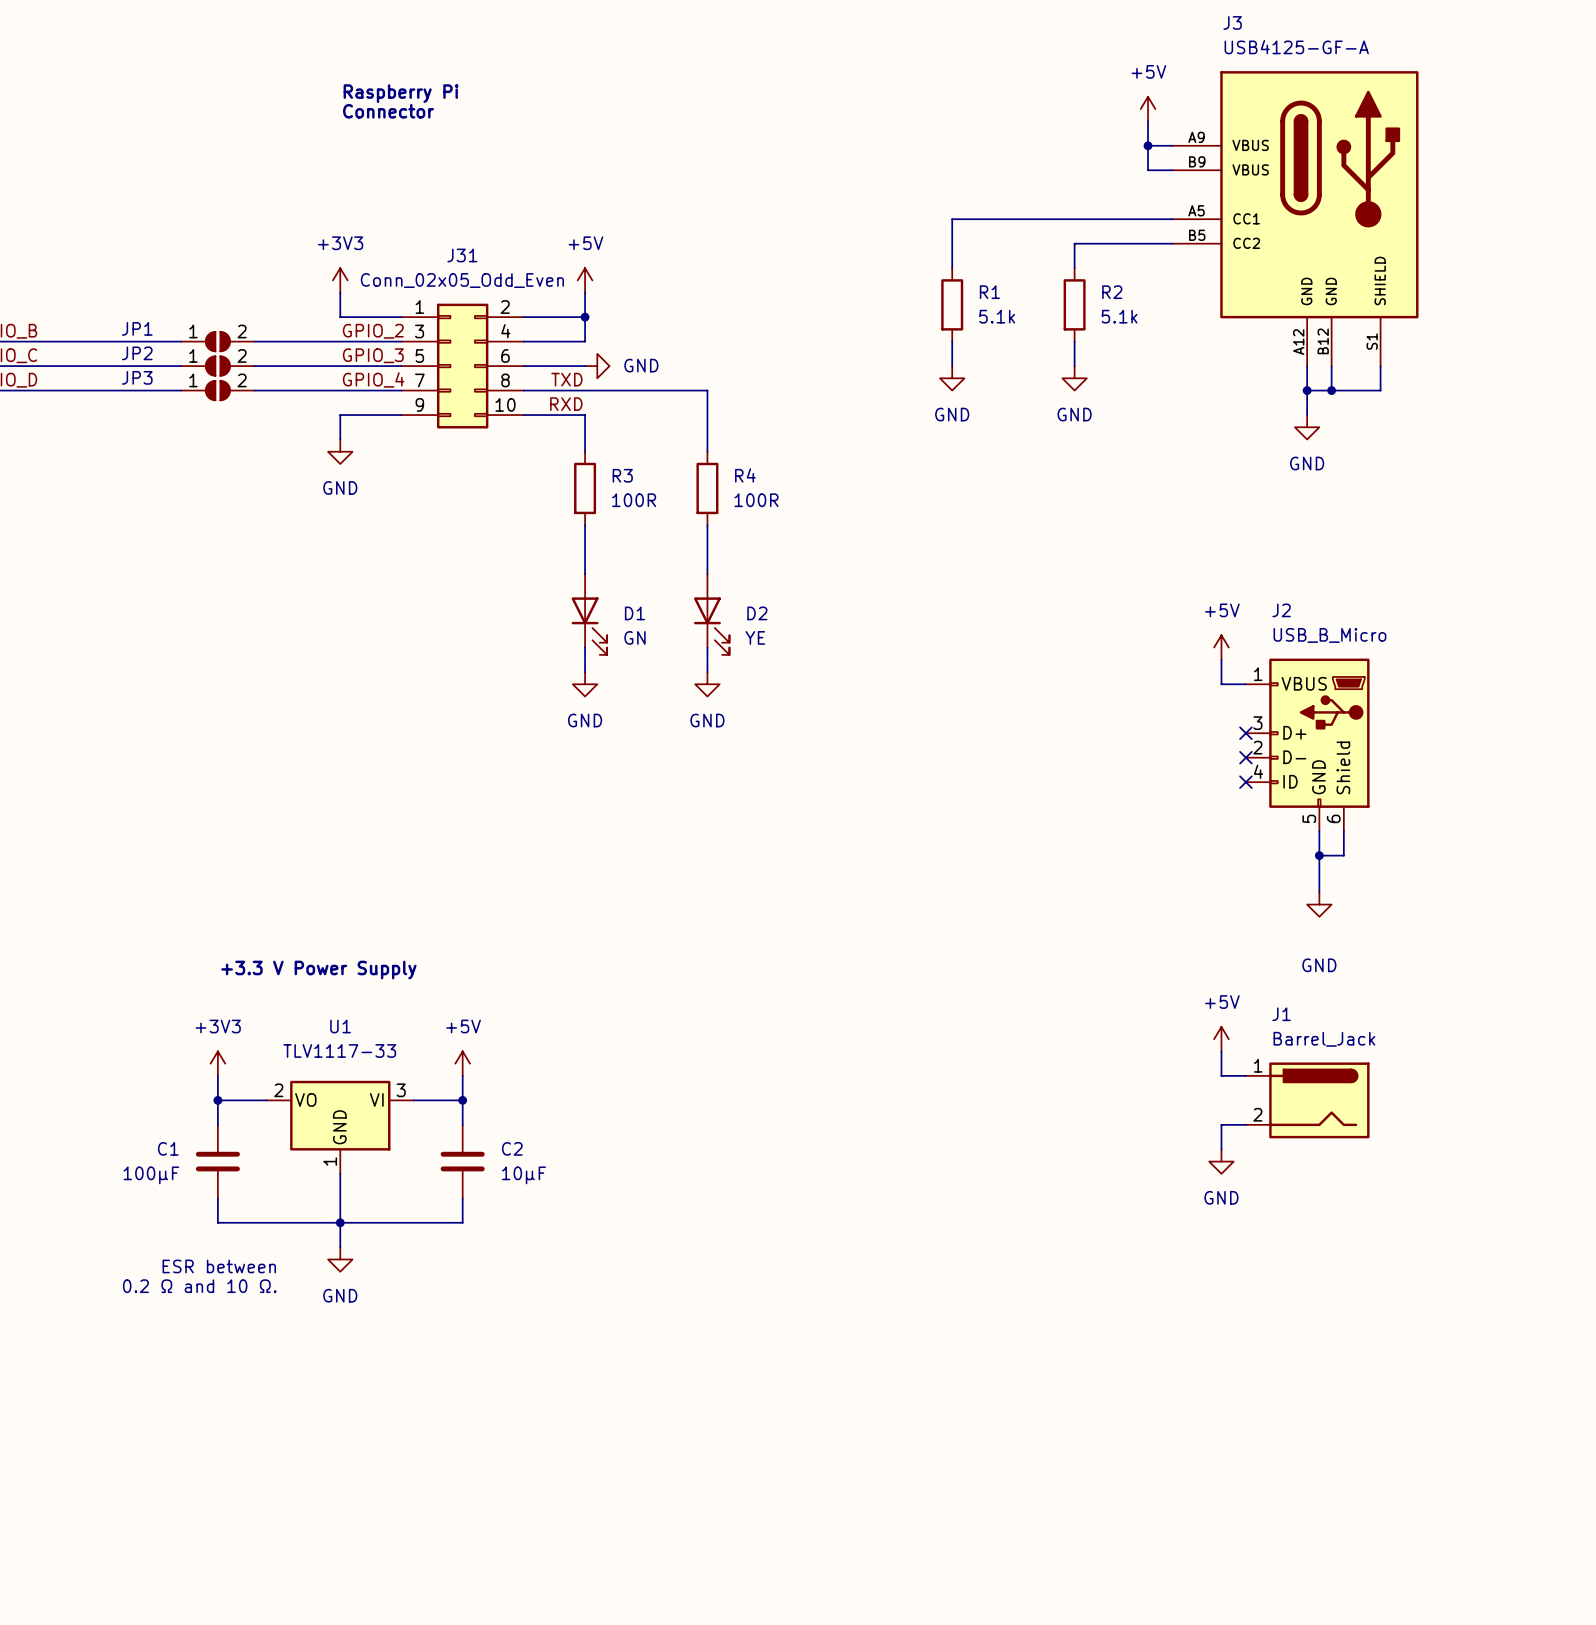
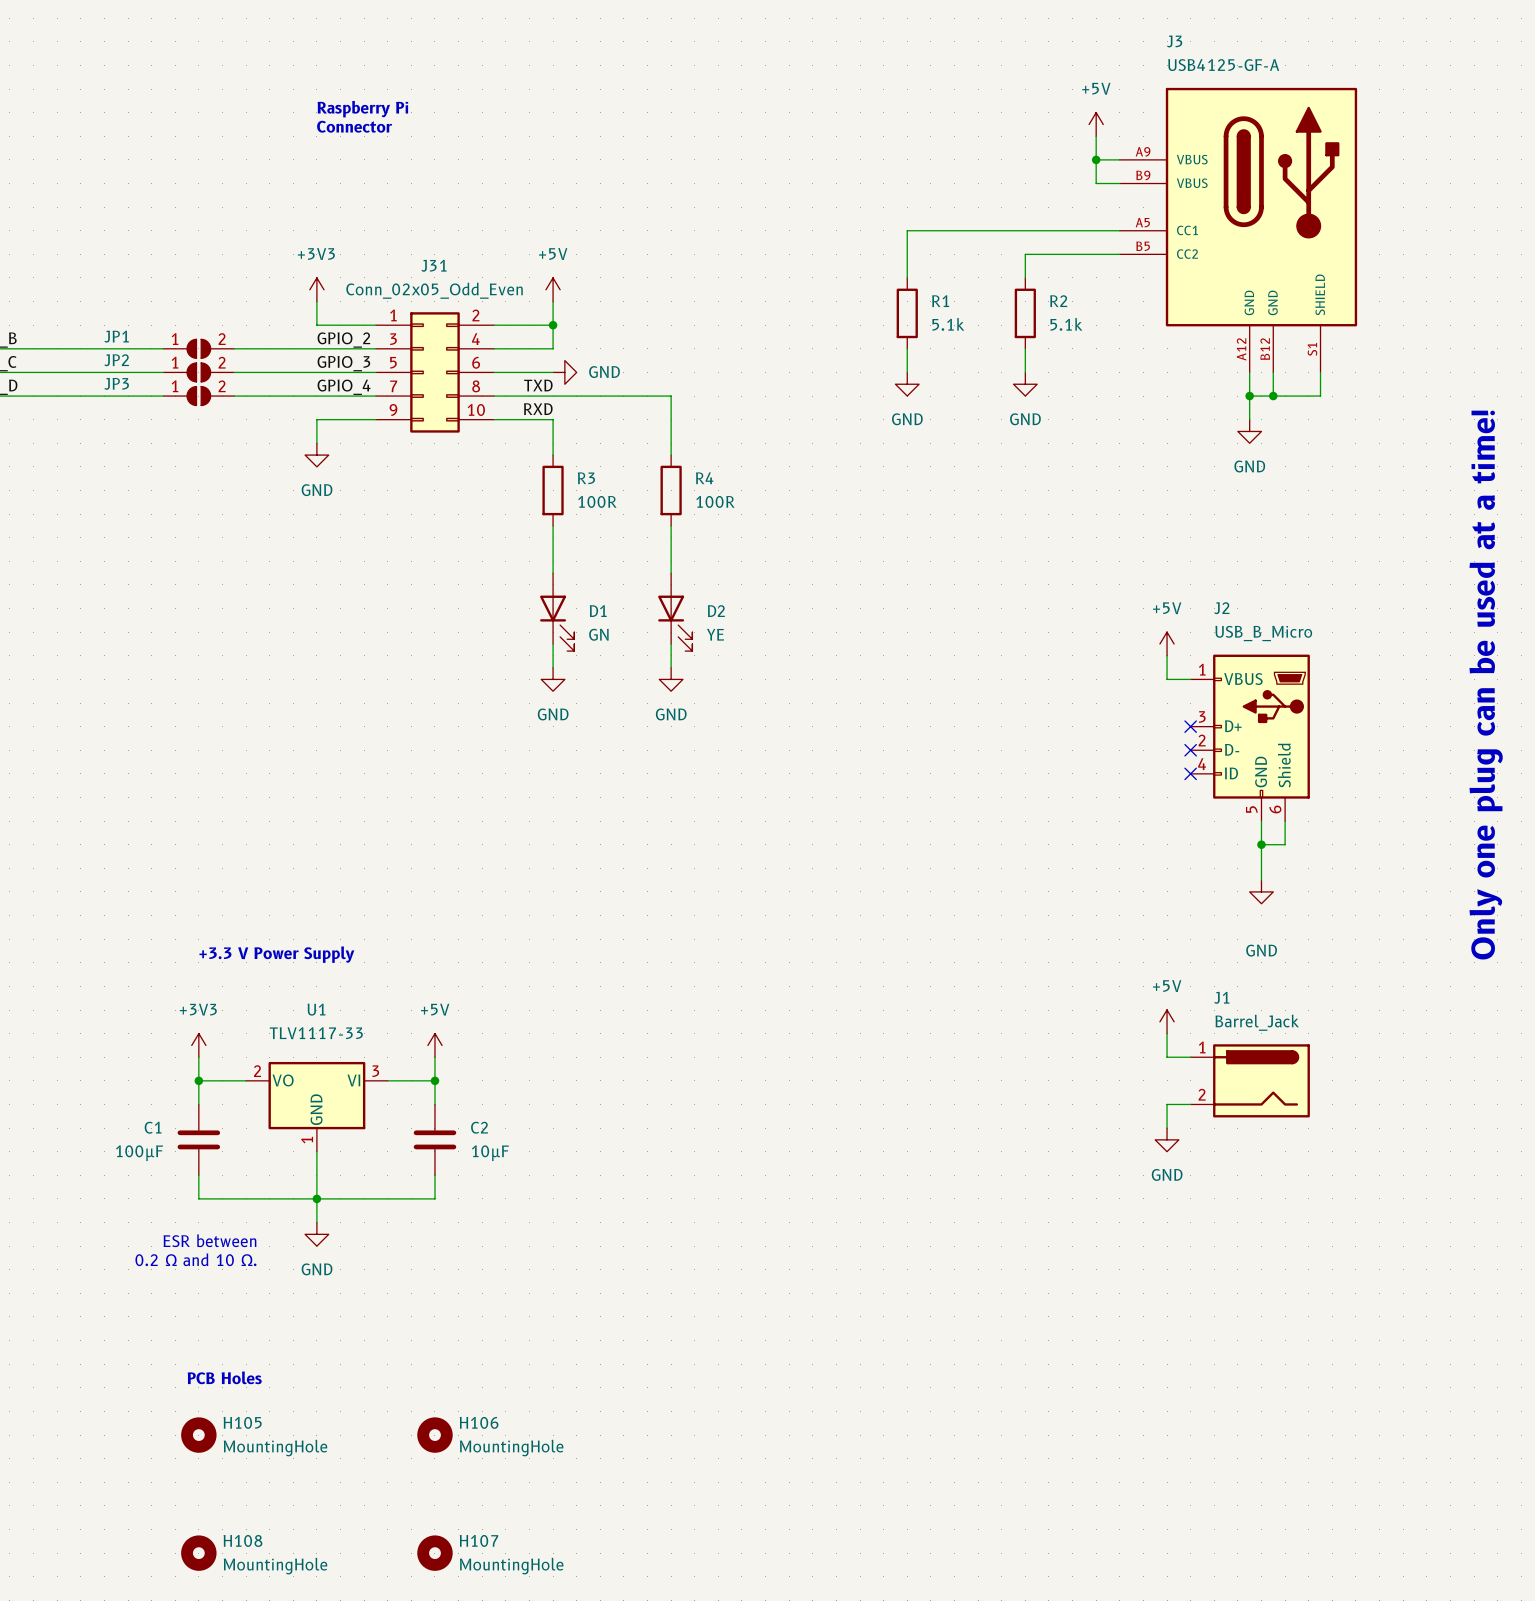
text: none -> Only one plug can be used at a time! (1486, 685)
text: none -> PCB Holes (224, 1377)
H105: none -> MountingHole (198, 1435)
H106: none -> MountingHole (434, 1435)
H108: none -> MountingHole (198, 1553)
H107: none -> MountingHole (434, 1553)

